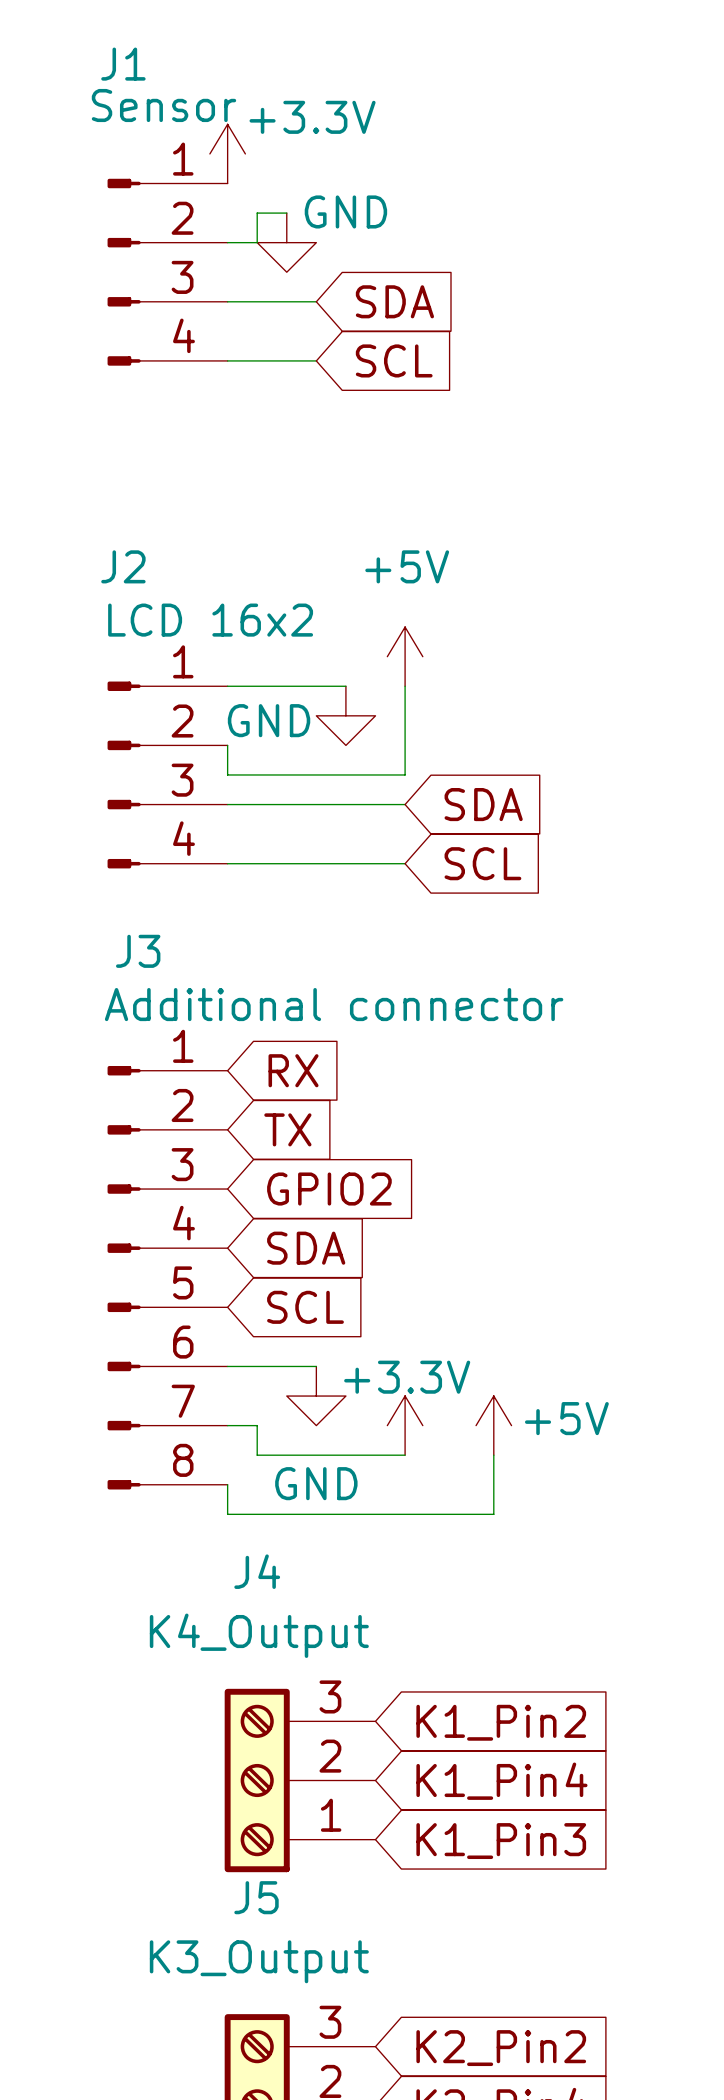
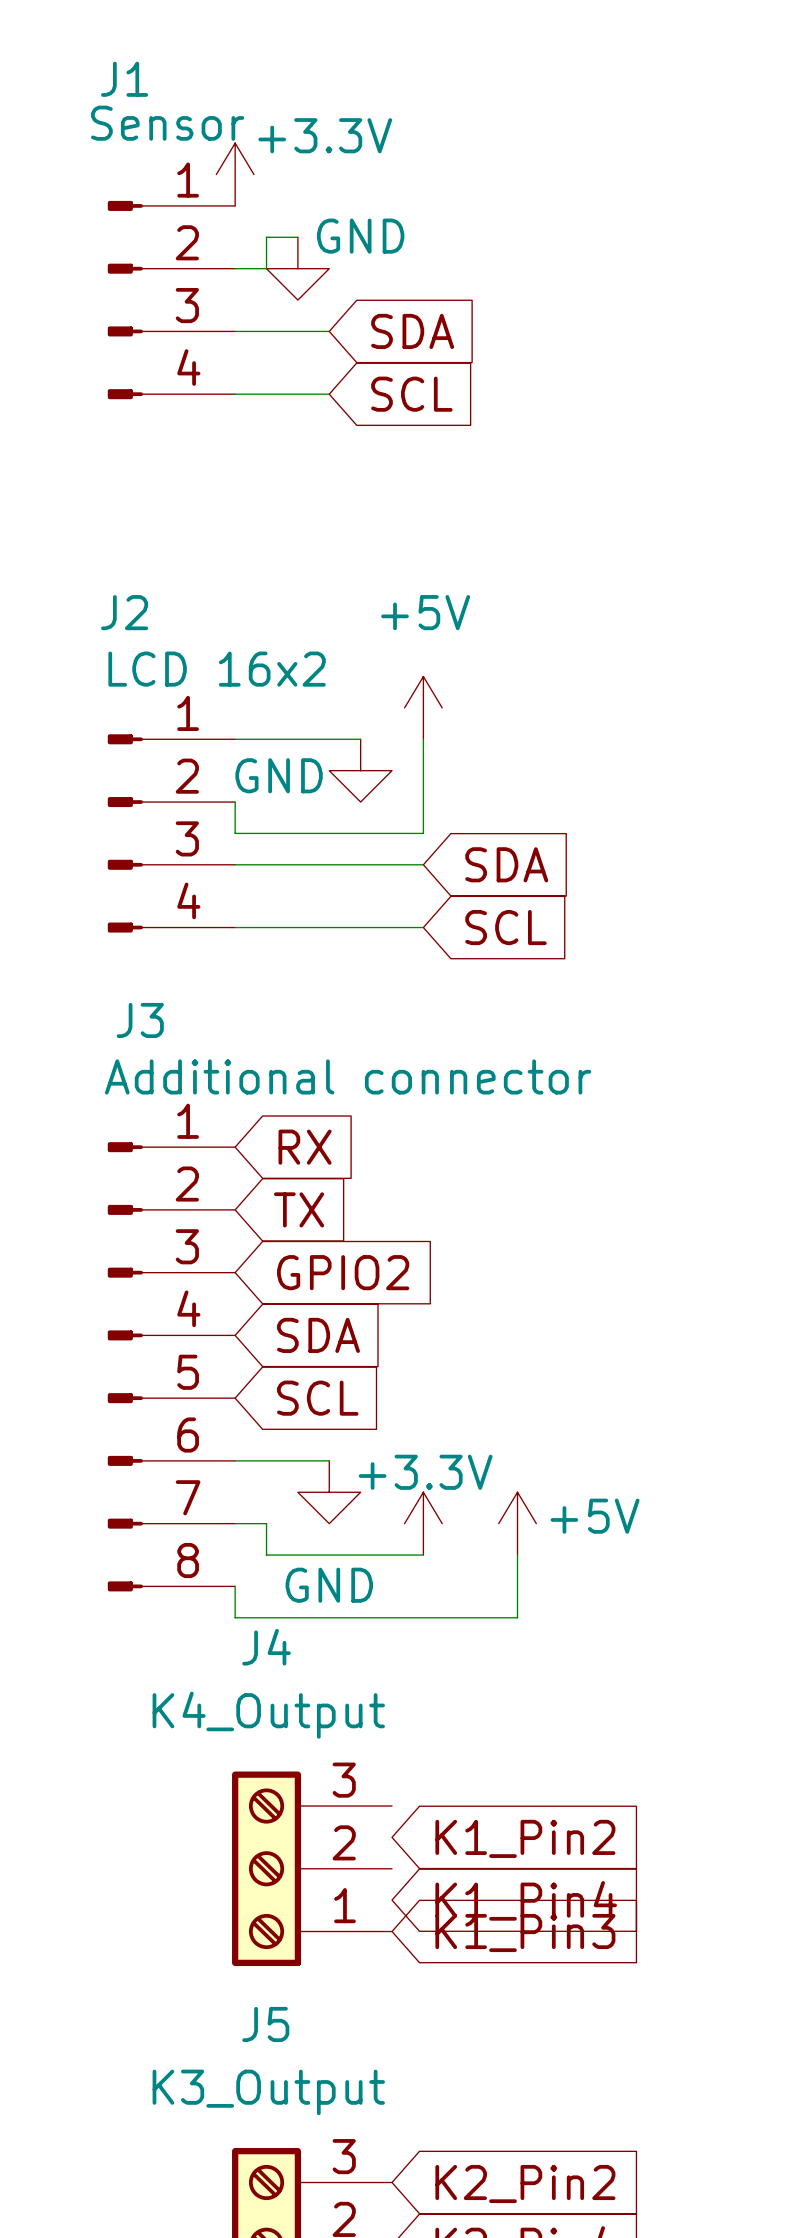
J4 position: (300, 1780) -> (312, 1868)
global label position: K1_Pin3 (501, 1841) -> K1_Pin3 (525, 1933)

